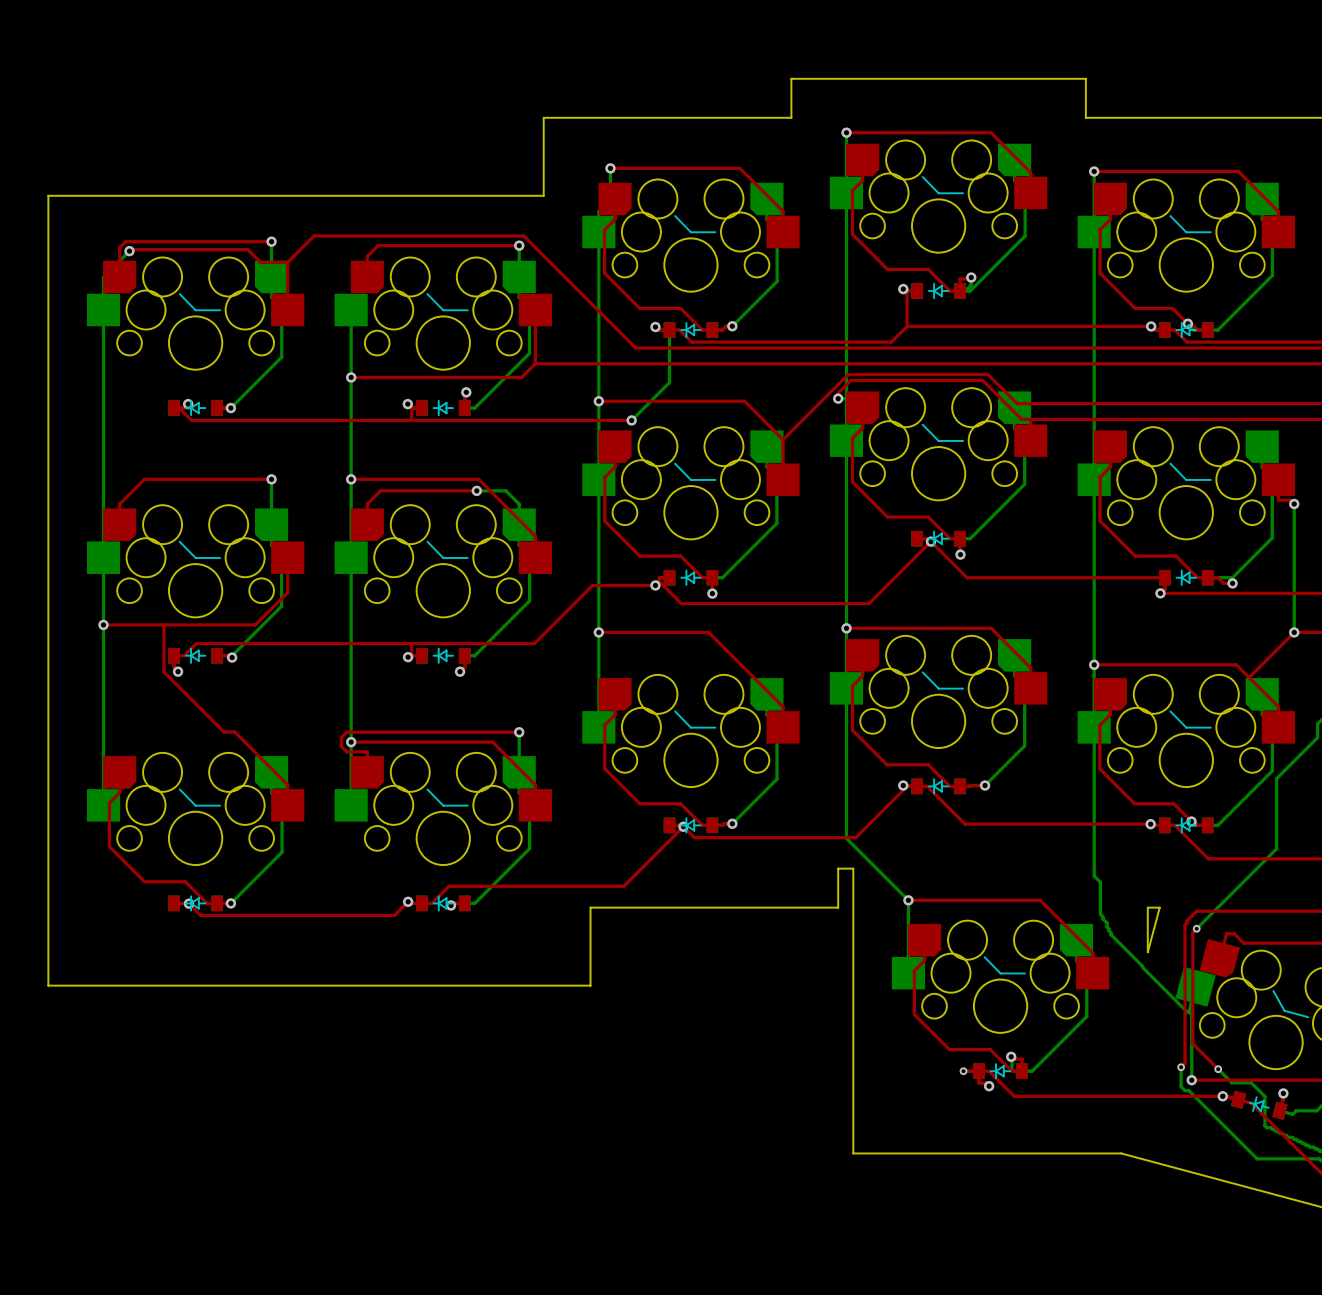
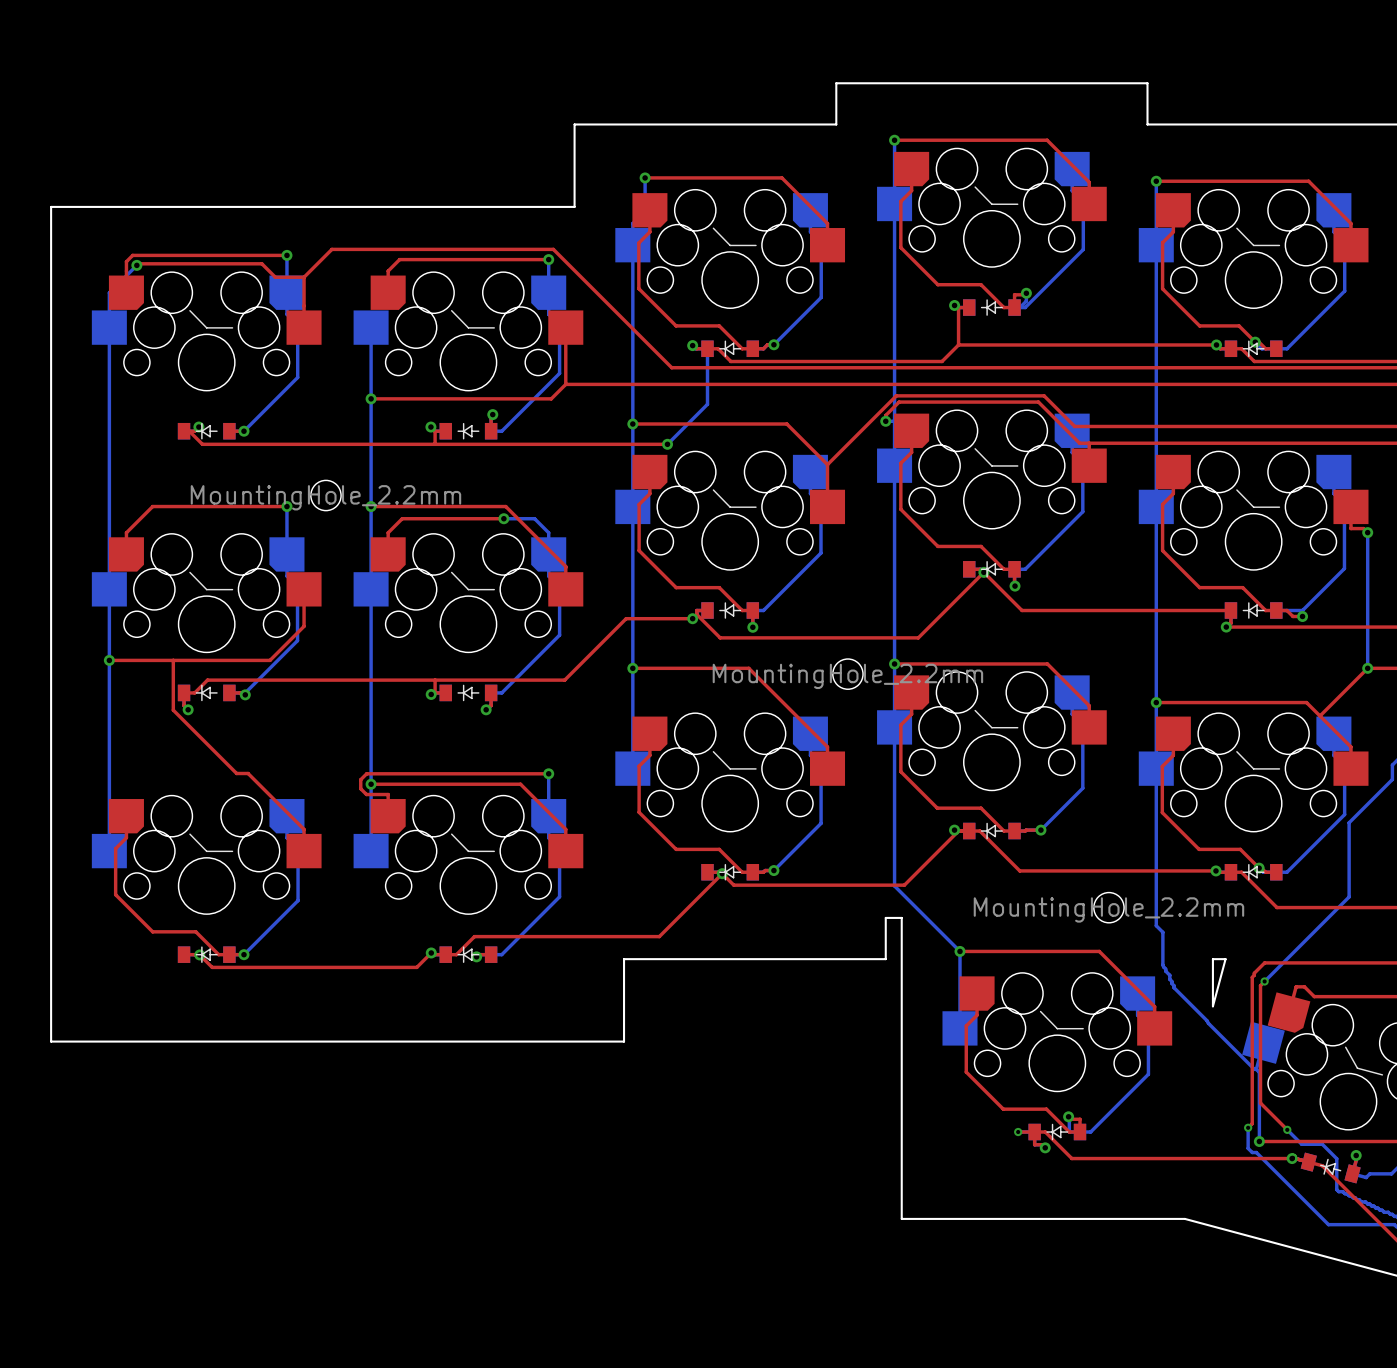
part: none -> MountingHole_2.2mm (325, 495)
part: none -> MountingHole_2.2mm (847, 674)
part: none -> MountingHole_2.2mm (1108, 907)

